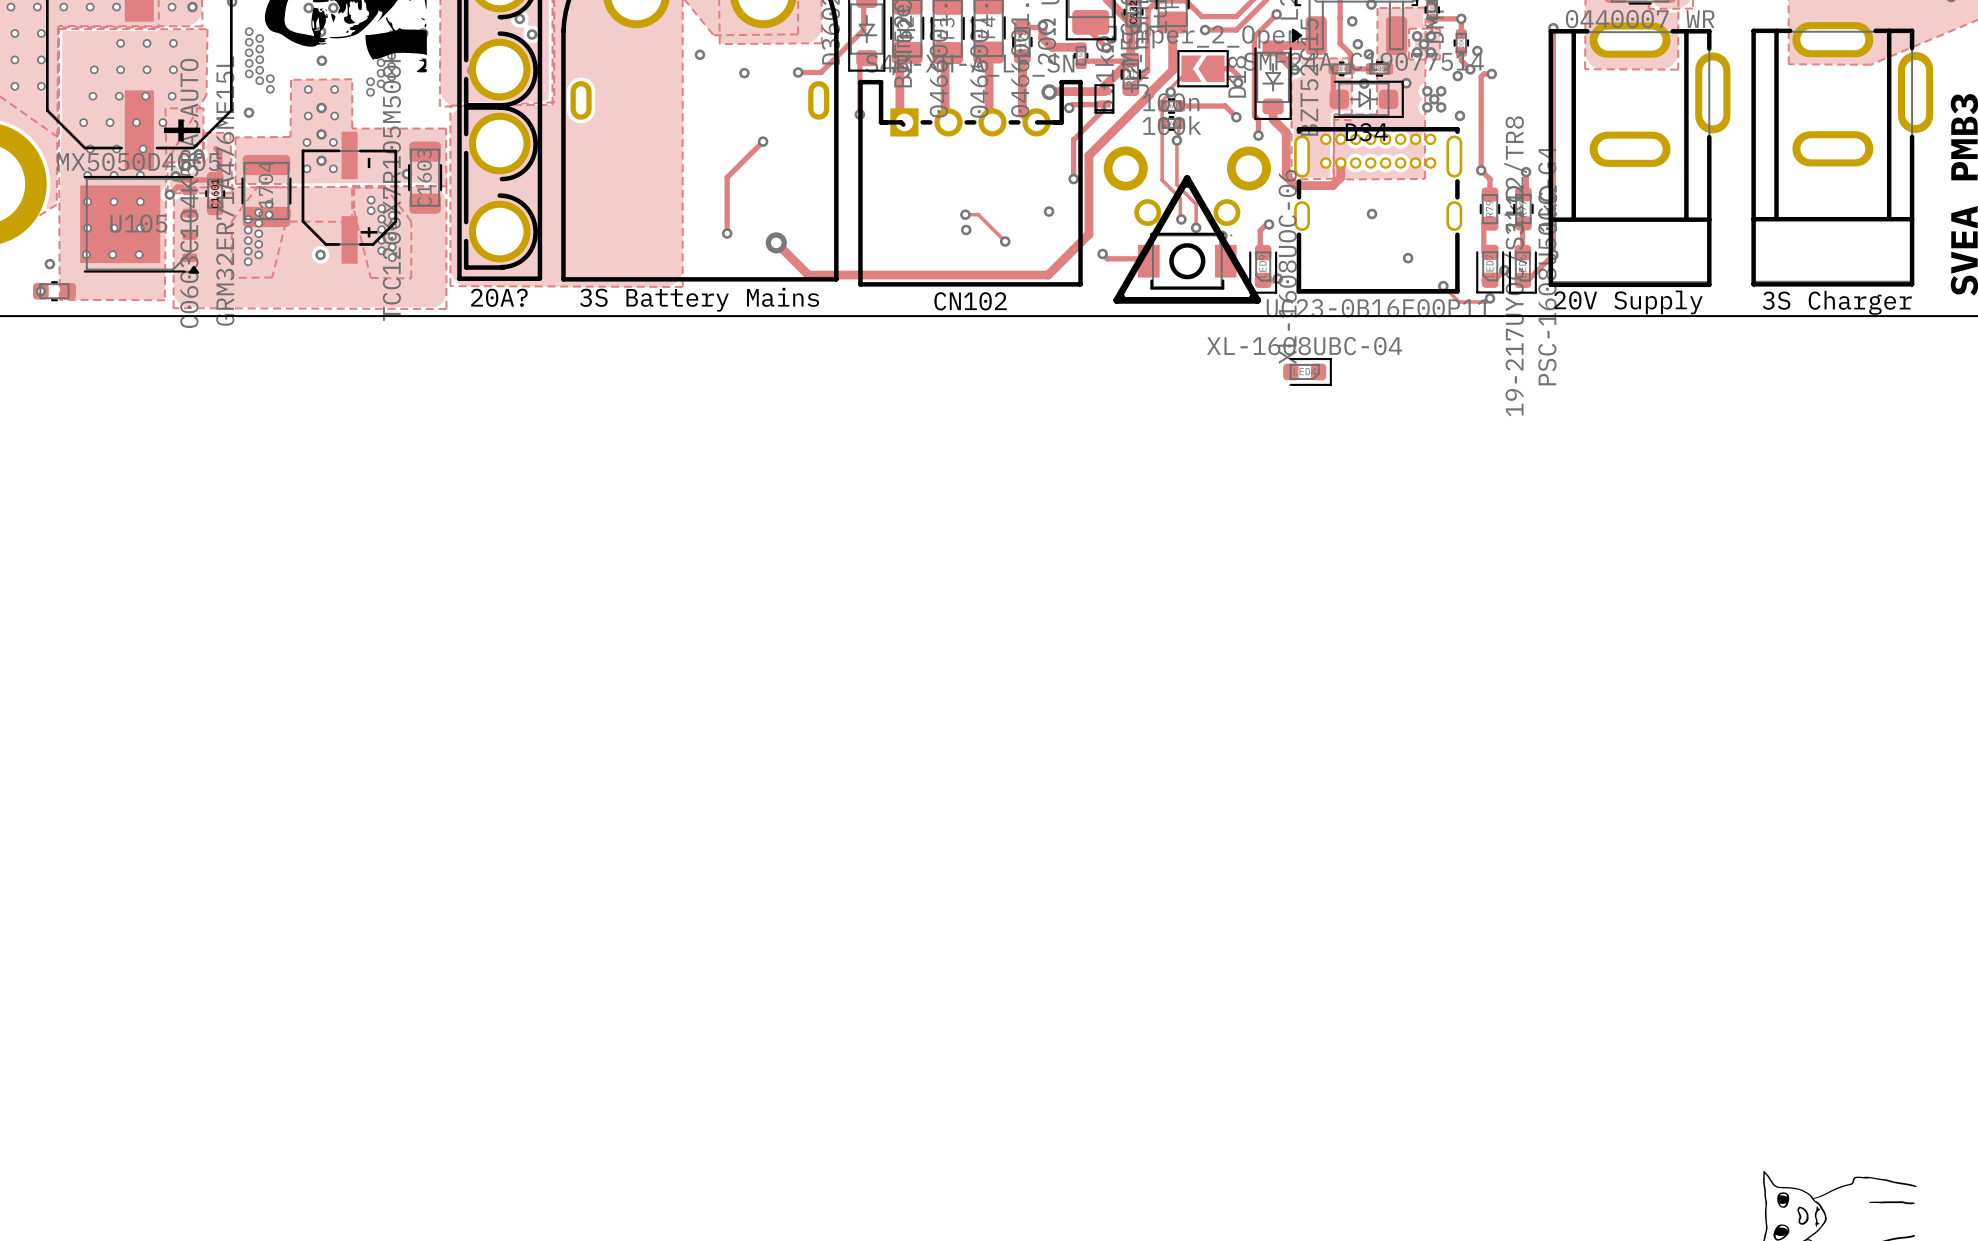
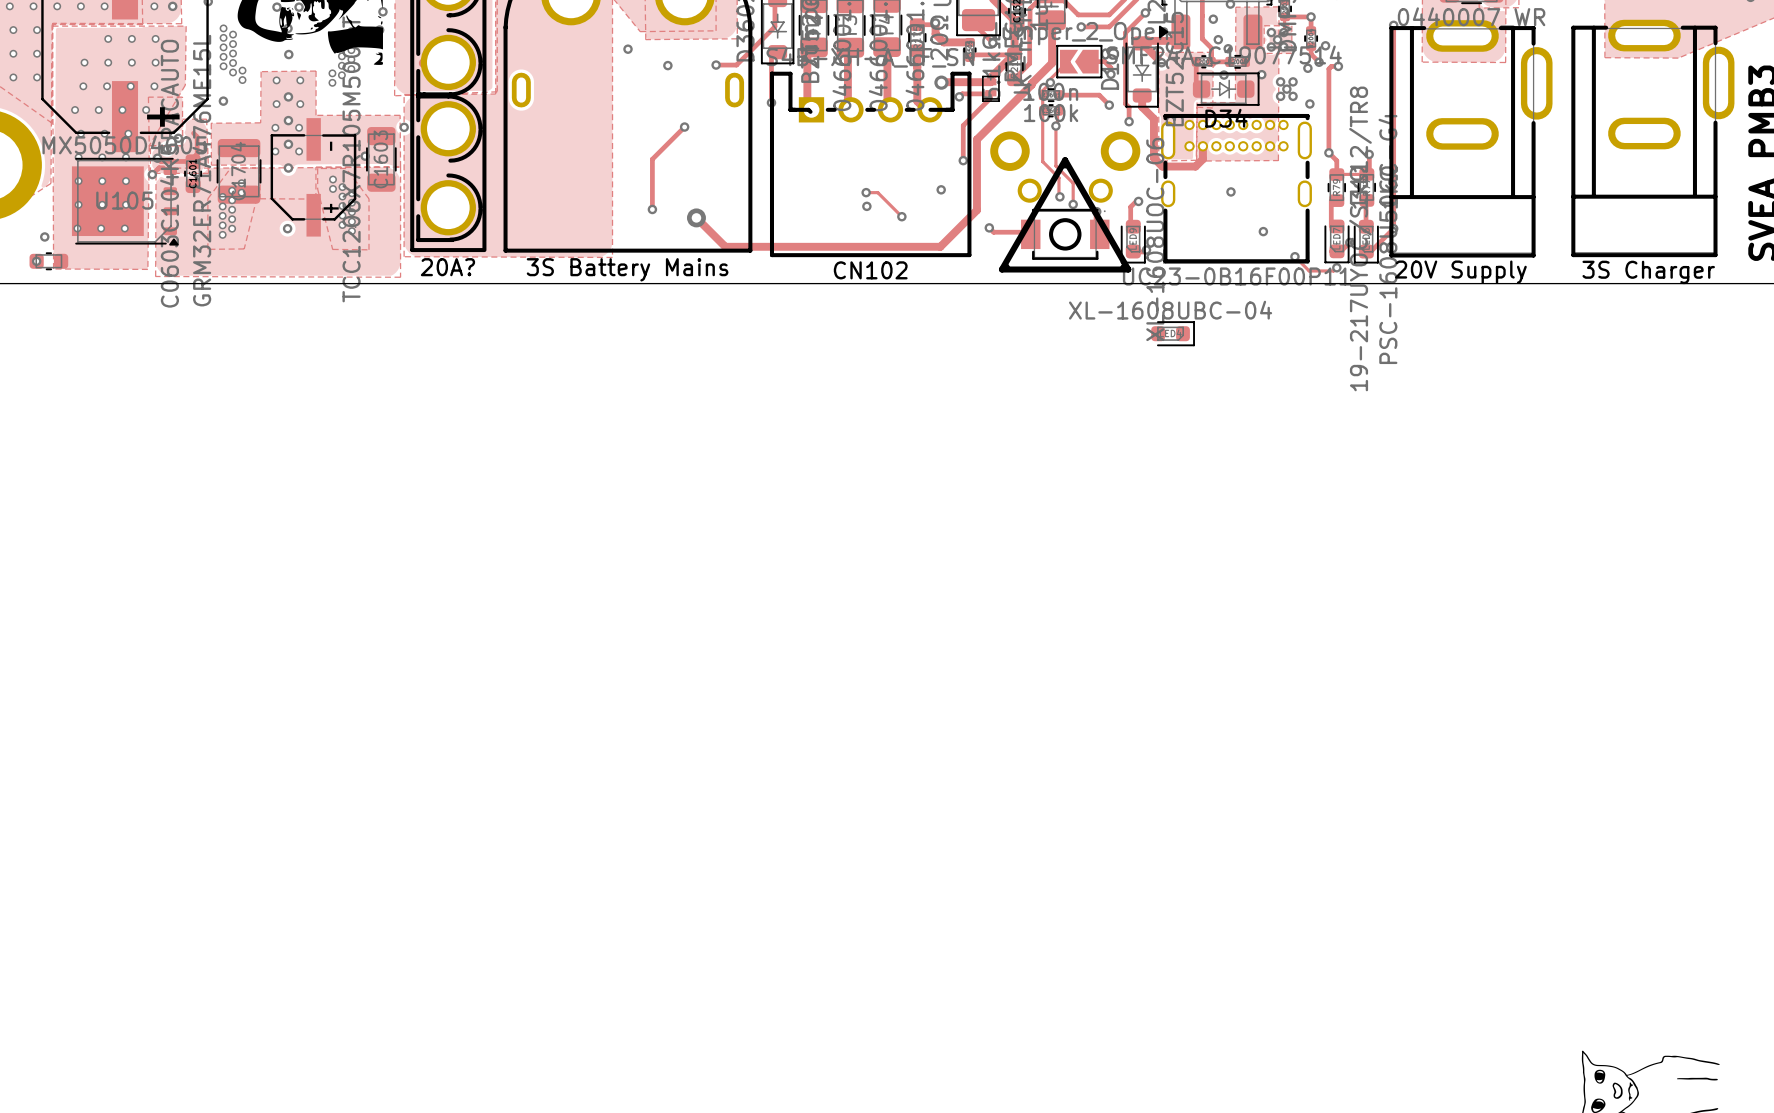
via: none -> (382, 11)
via: (519, 18) -> none
via: (532, 34) -> none
via: none -> (404, 127)
via: none -> (288, 167)
track: none -> (1336, 174) (1366, 174)

